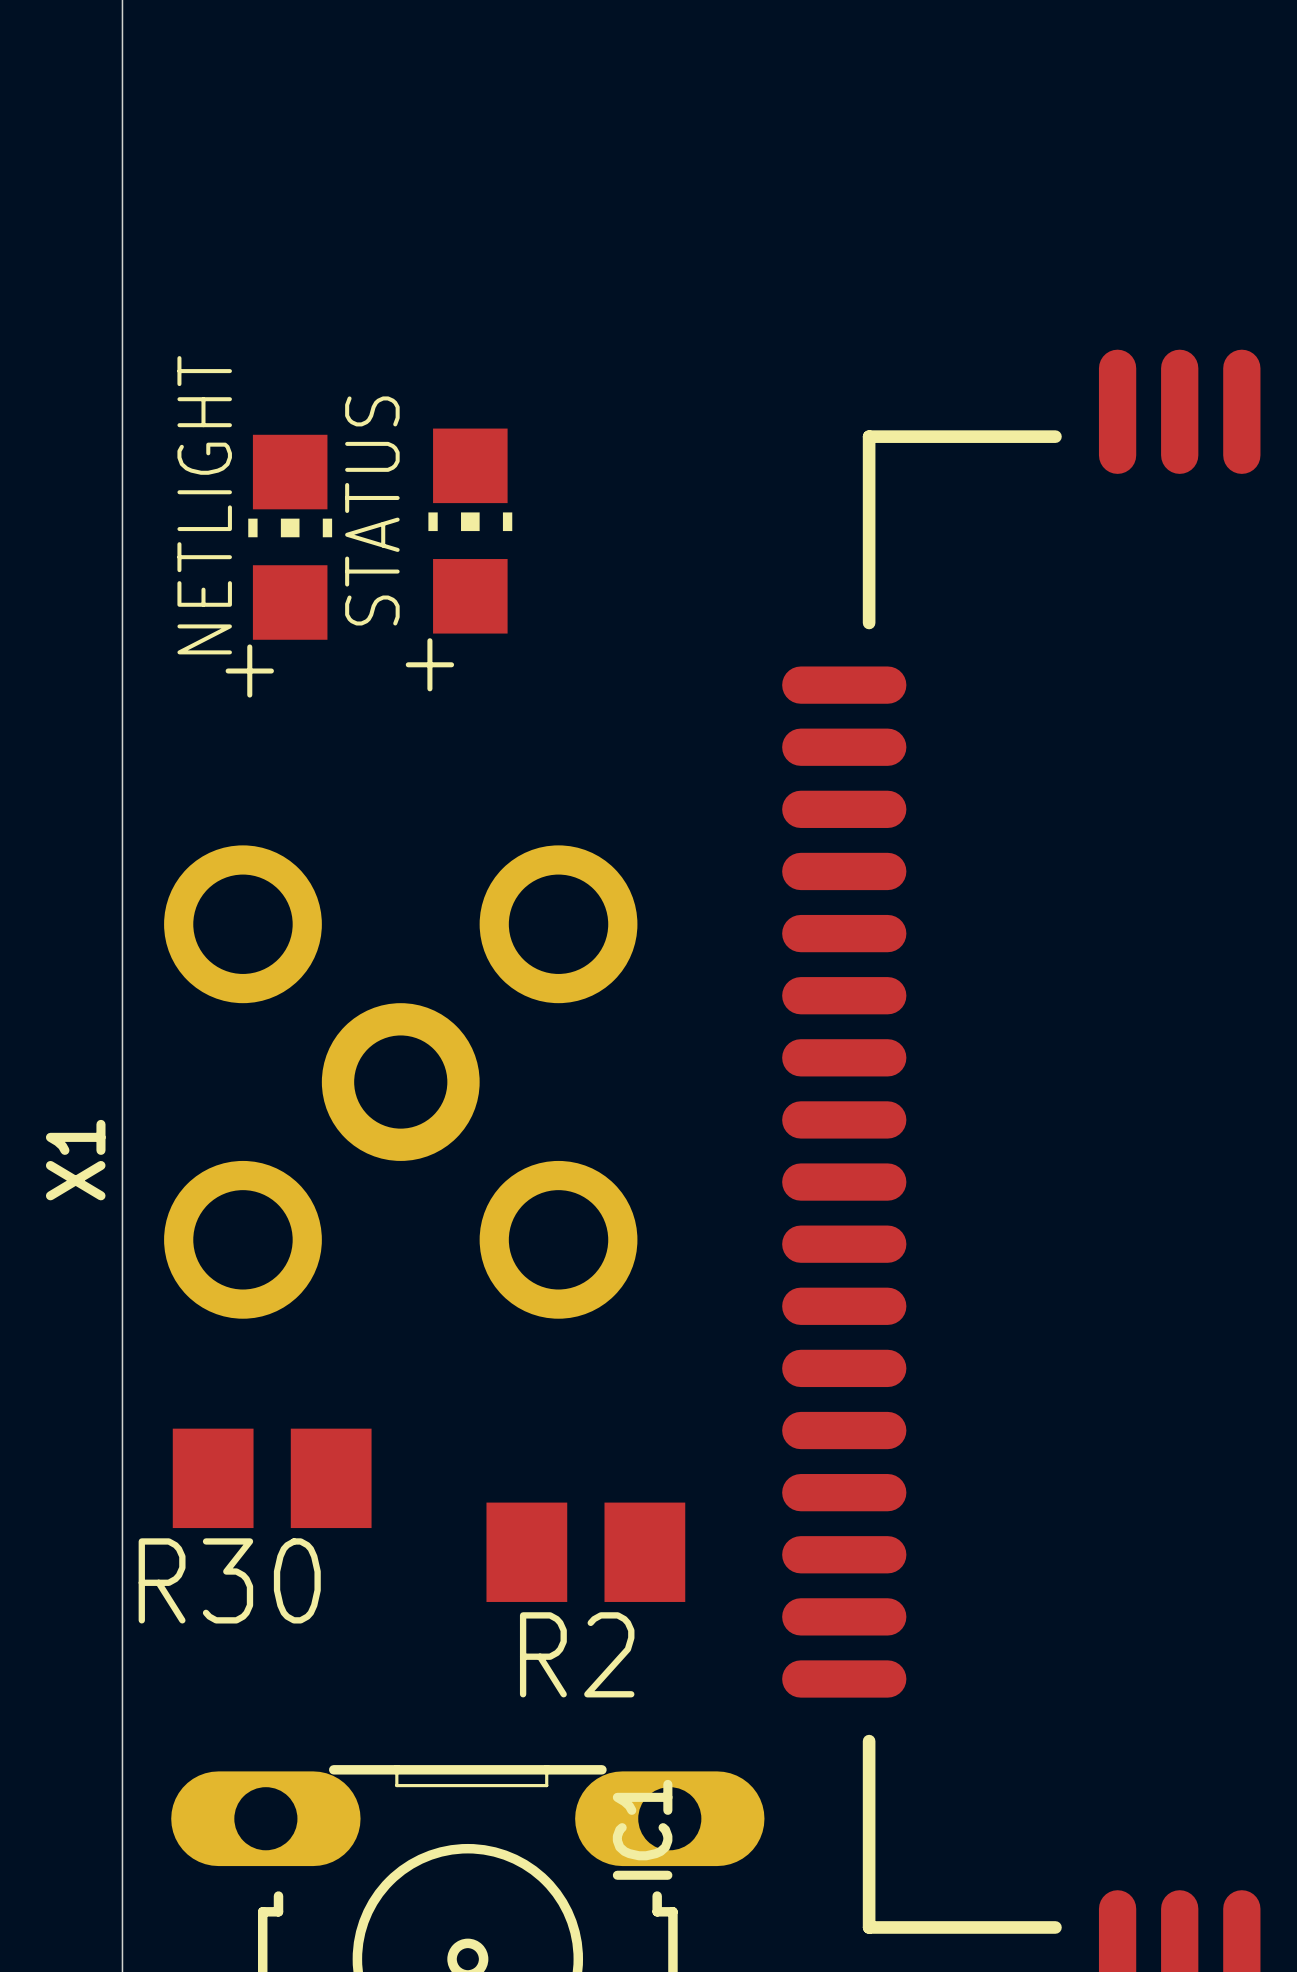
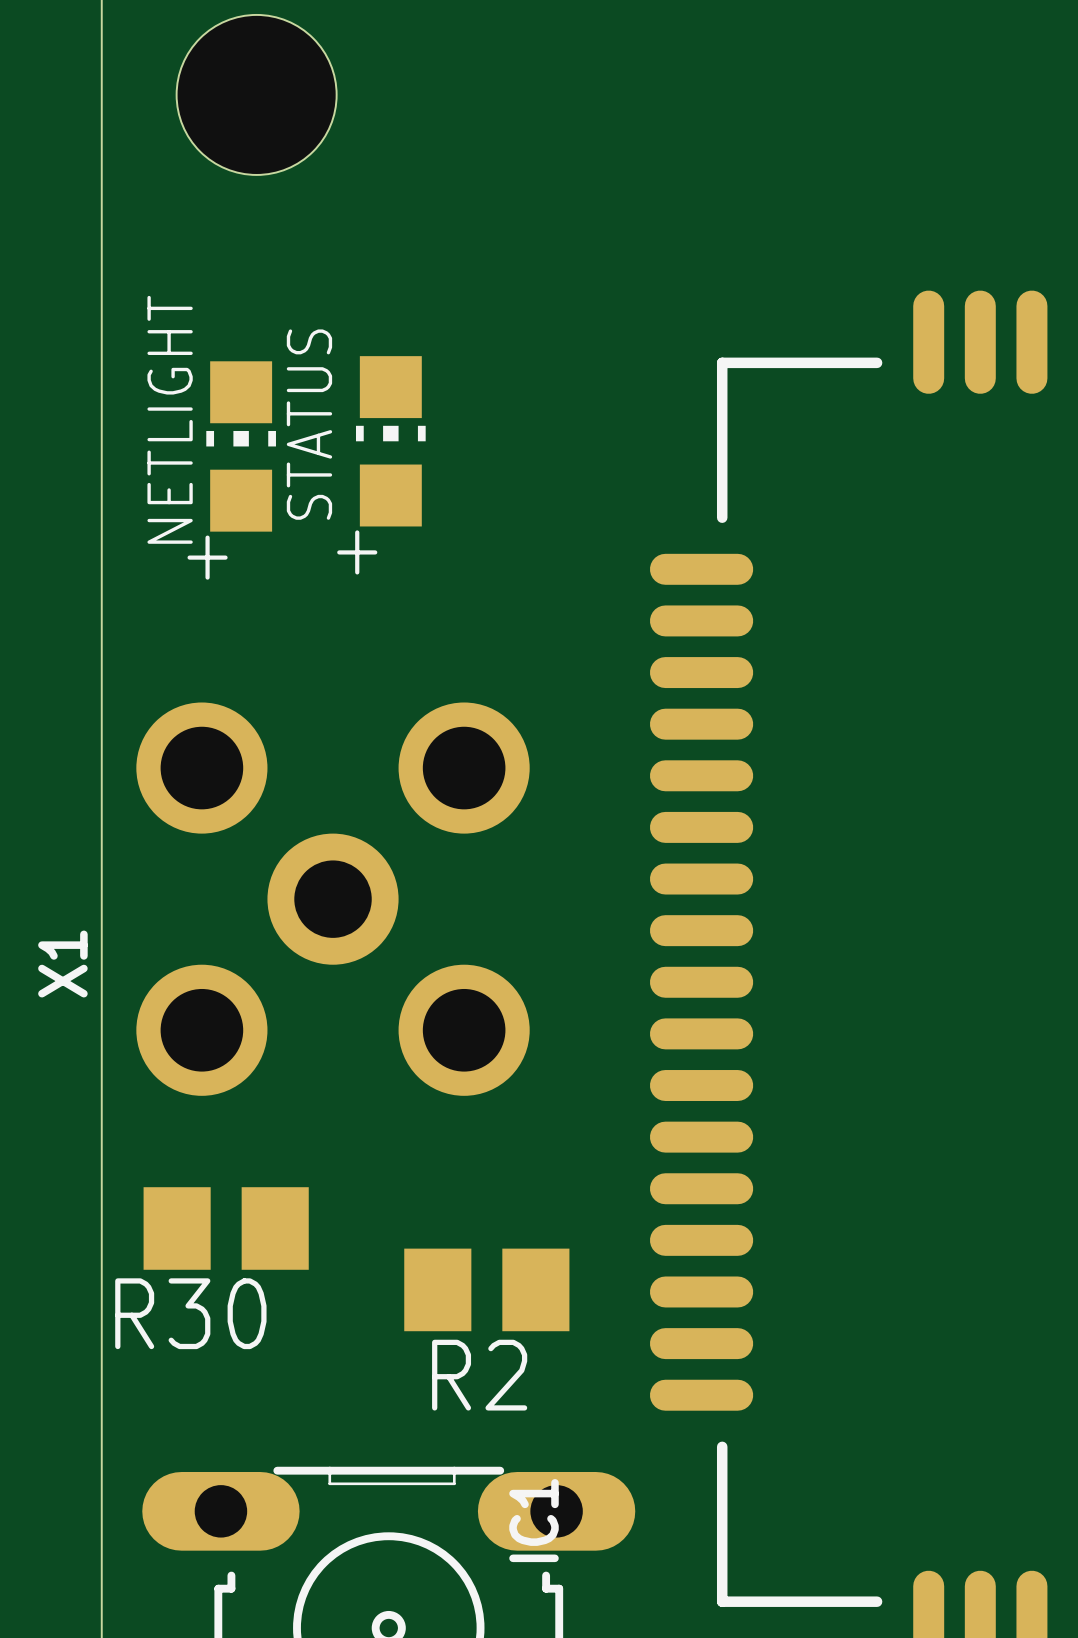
hole: none -> (256, 94)

